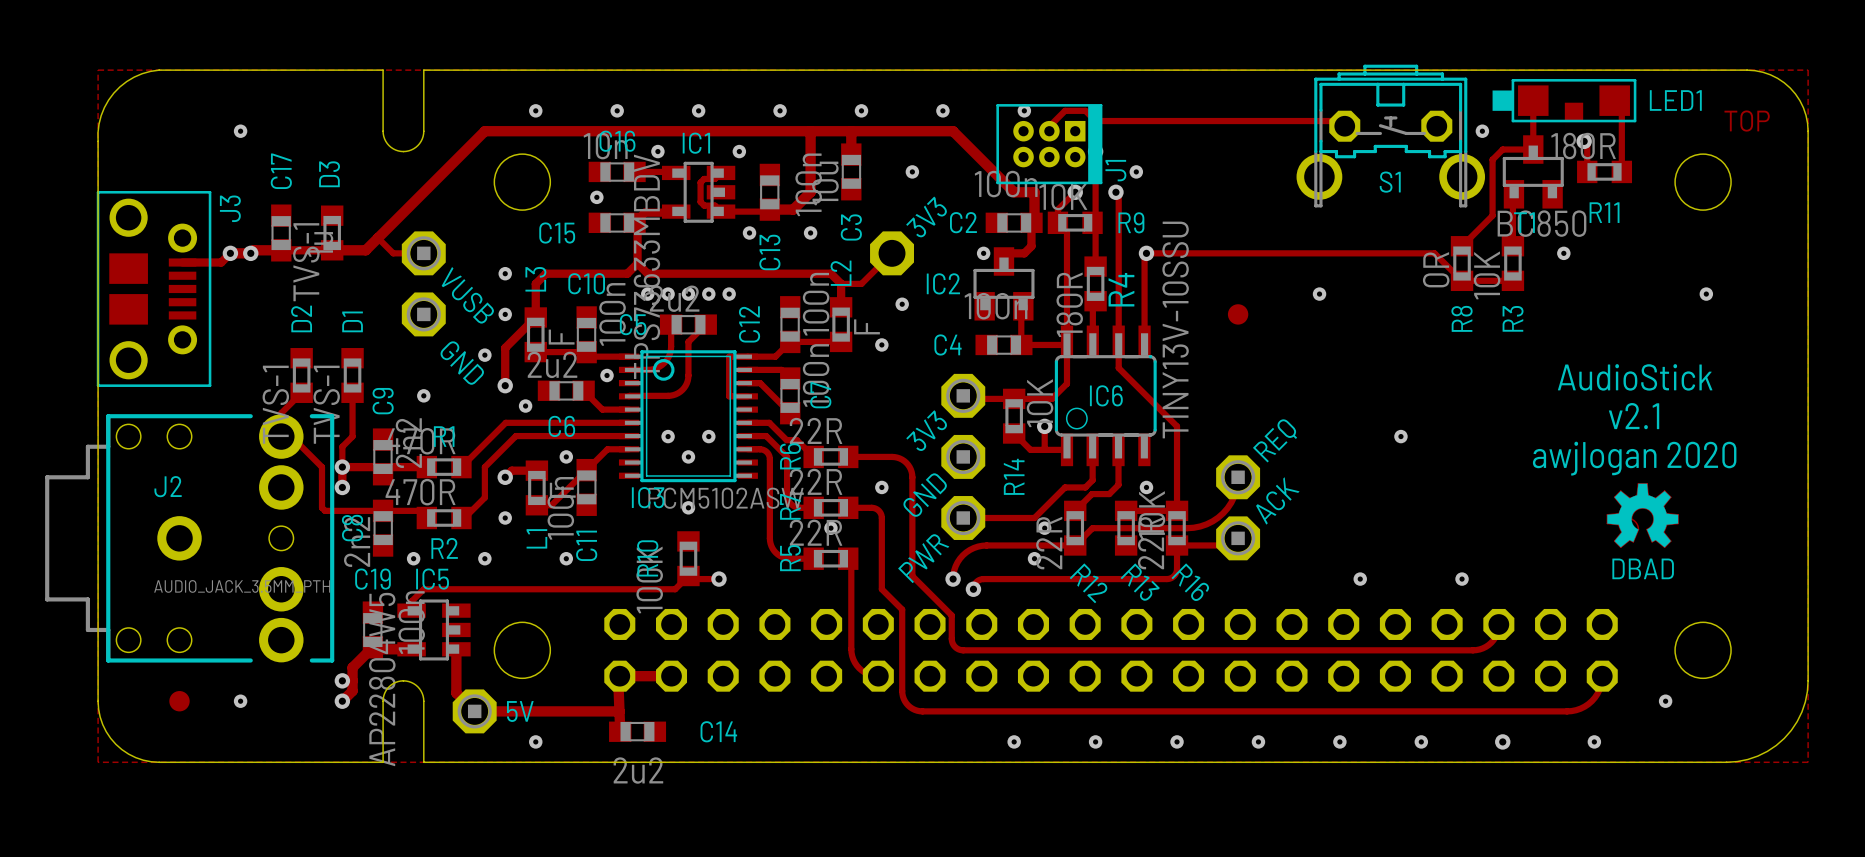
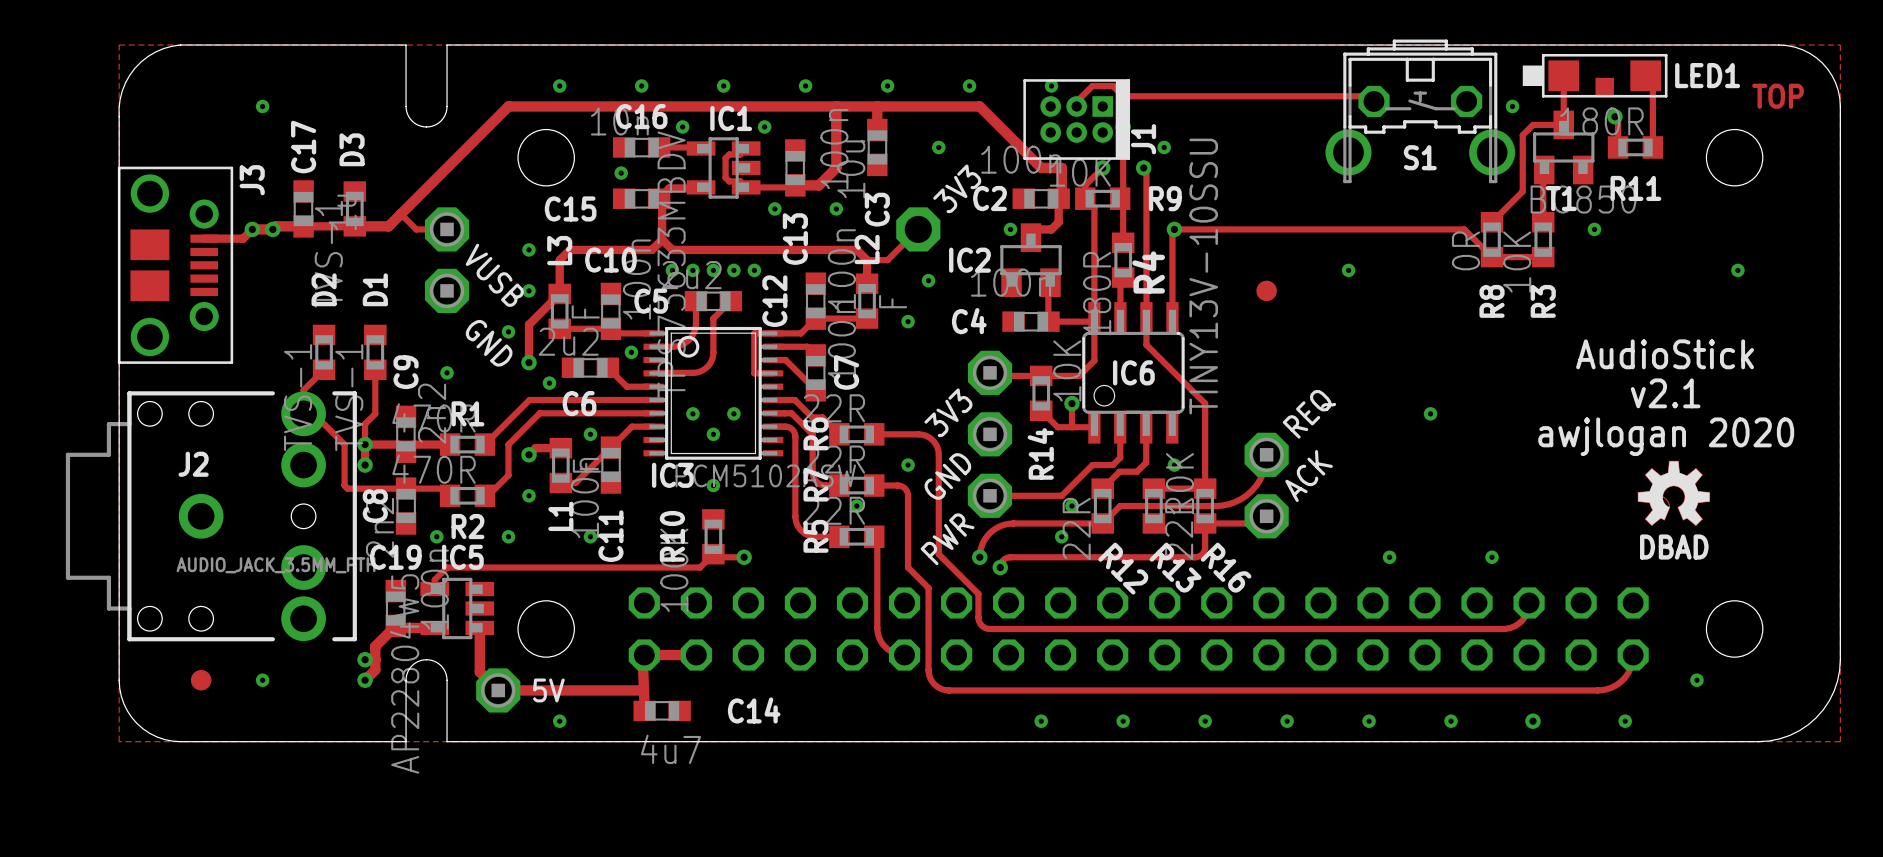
C14 value: 2u2 (638, 770) -> 4u7 (670, 749)

